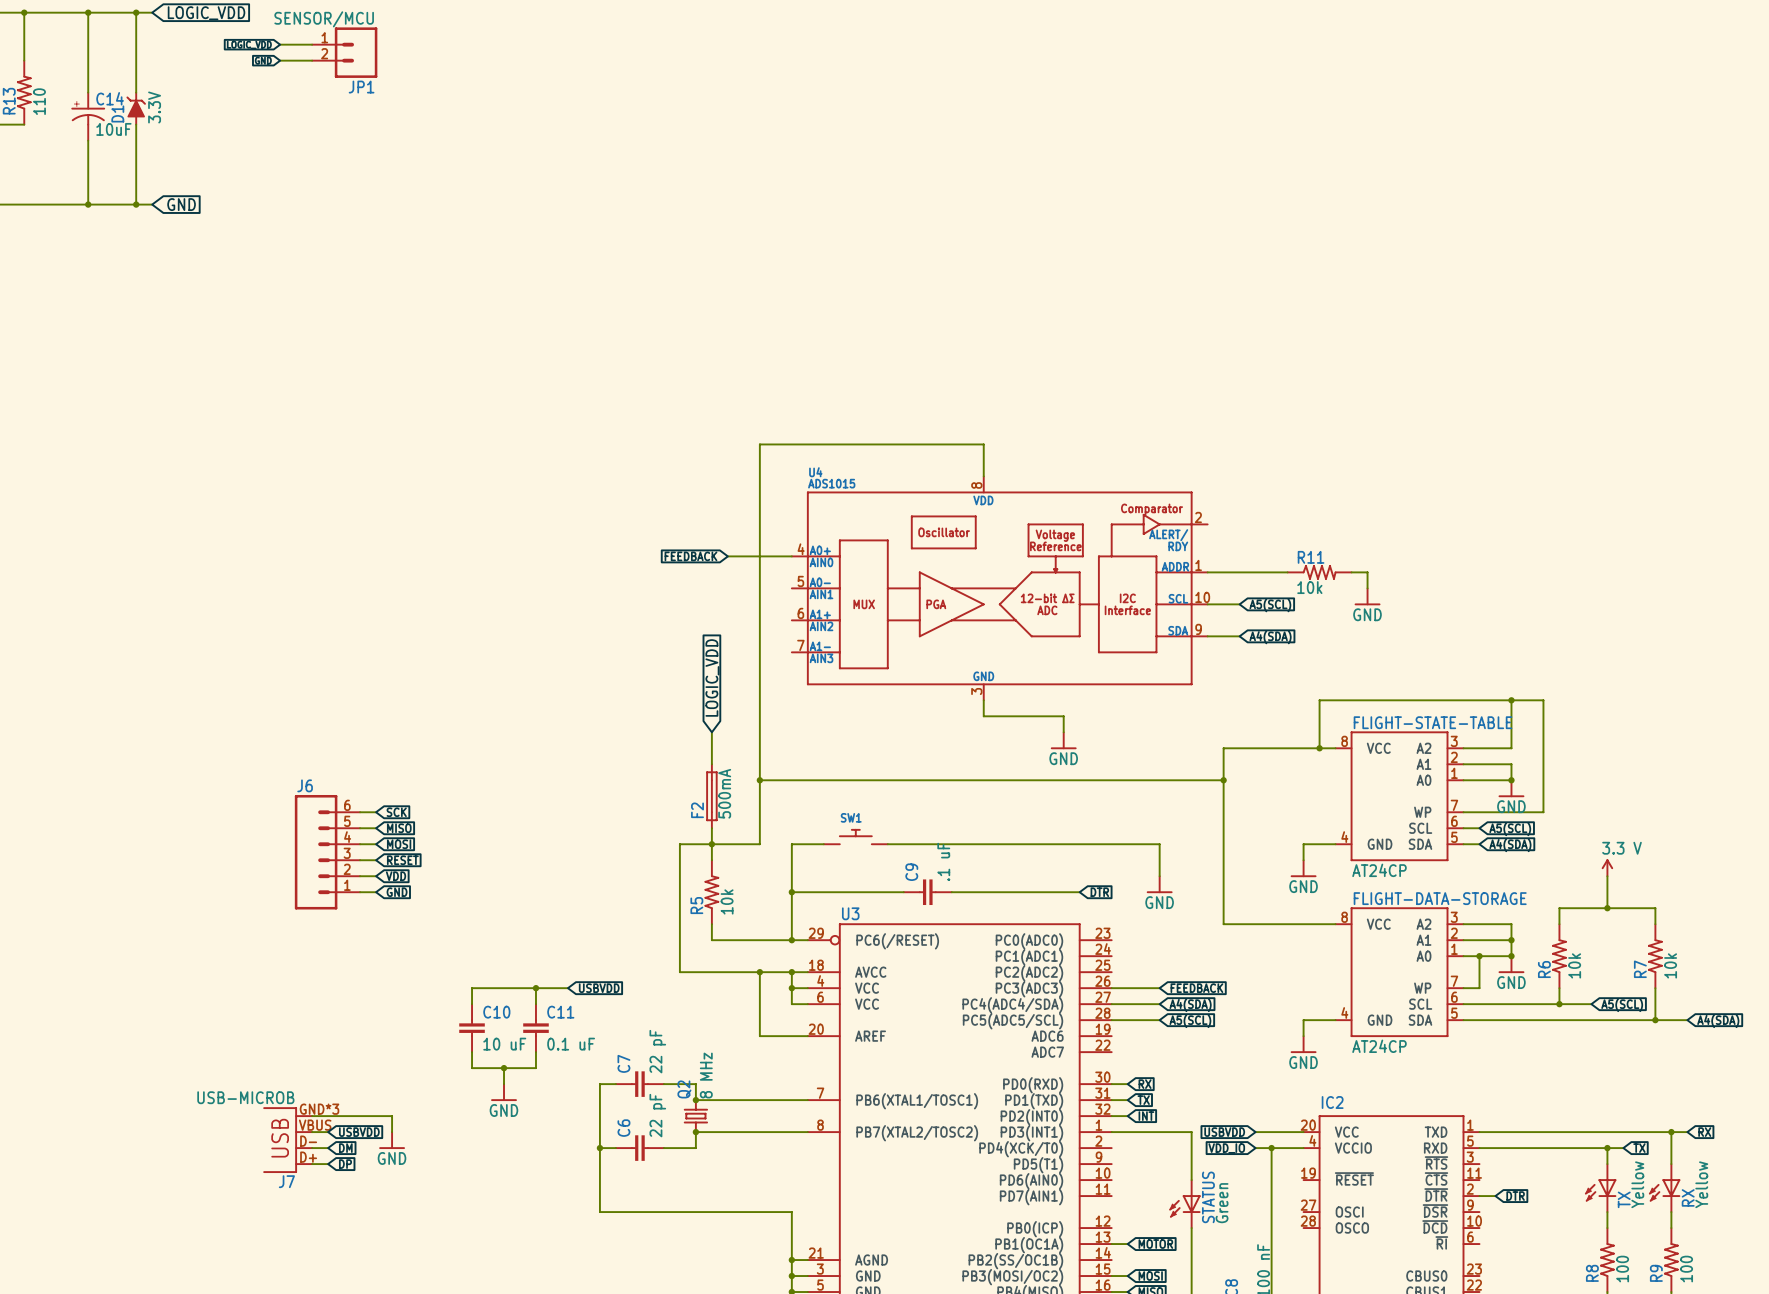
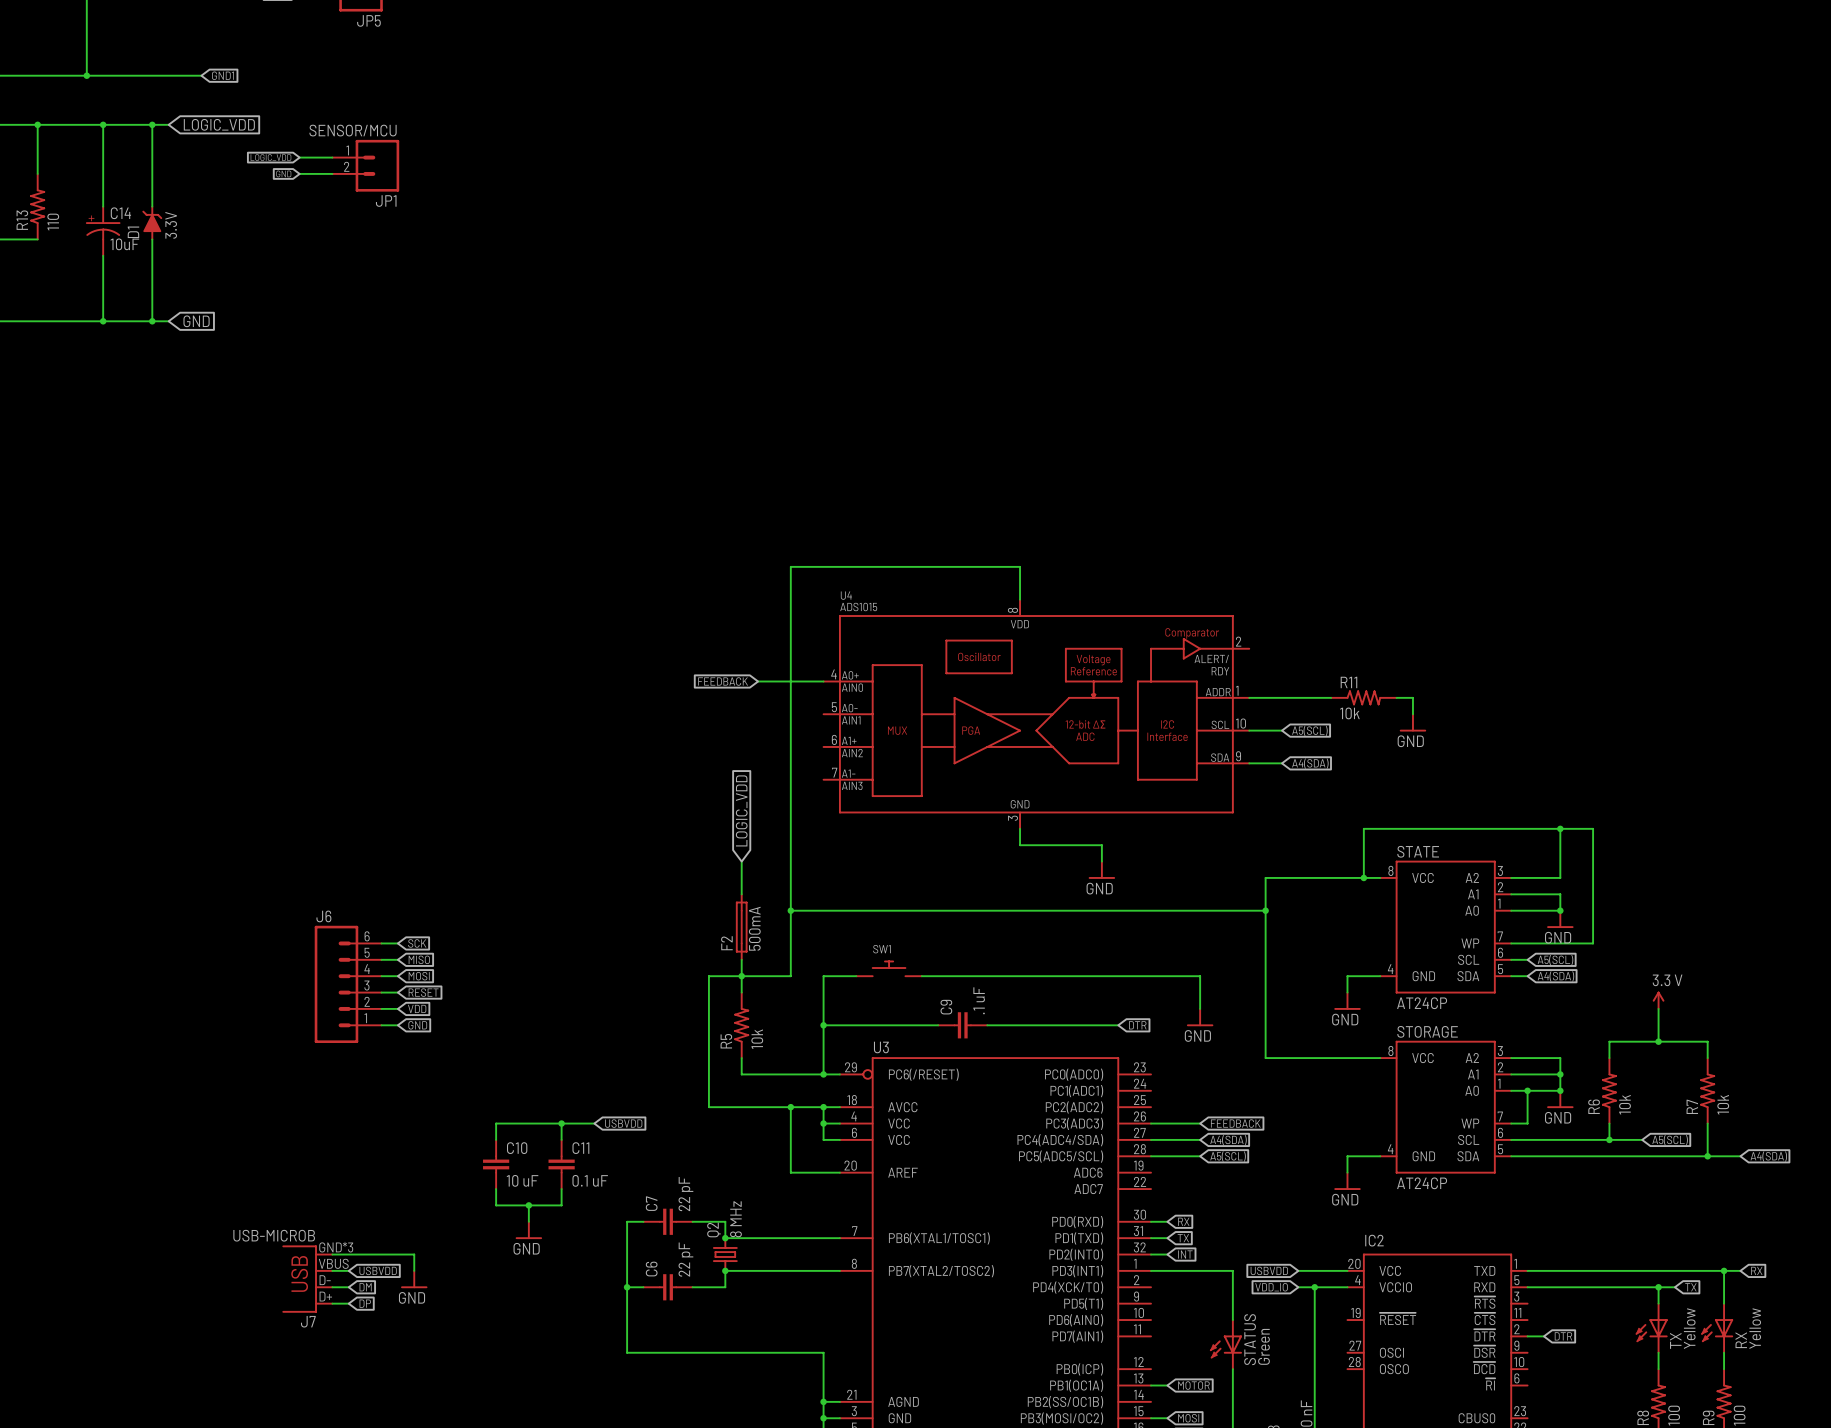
FLIGHT-STATE-TABLE name: FLIGHT-STATE-TABLE (1432, 722) -> STATE (1418, 851)
FLIGHT-DATA-STORAGE name: FLIGHT-DATA-STORAGE (1440, 898) -> STORAGE (1427, 1031)

